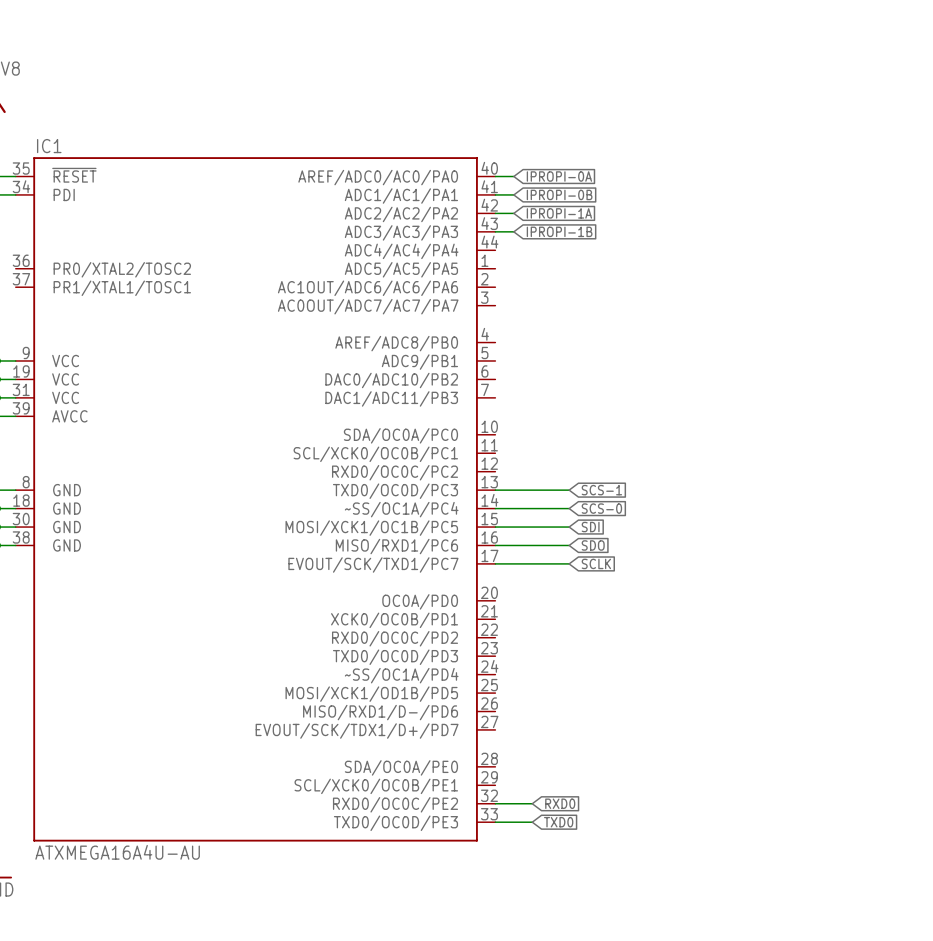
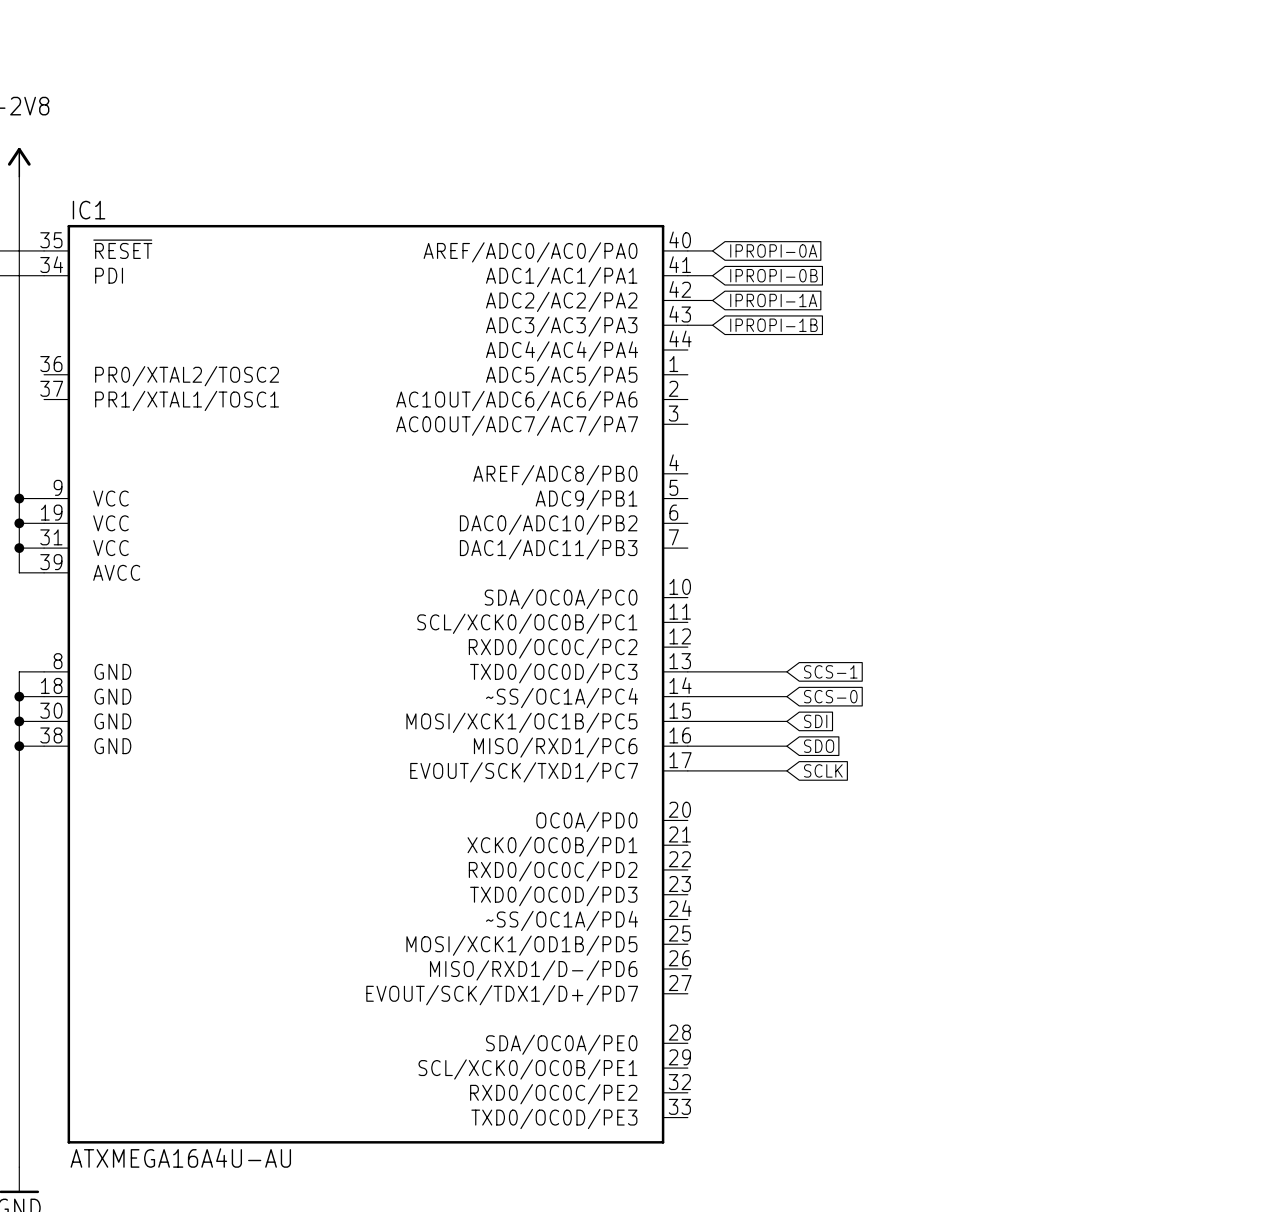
wire: (495, 803) (532, 803) -> none
global label: RXD0 (560, 803) -> none
wire: (495, 822) (532, 822) -> none
global label: TXD0 (558, 822) -> none

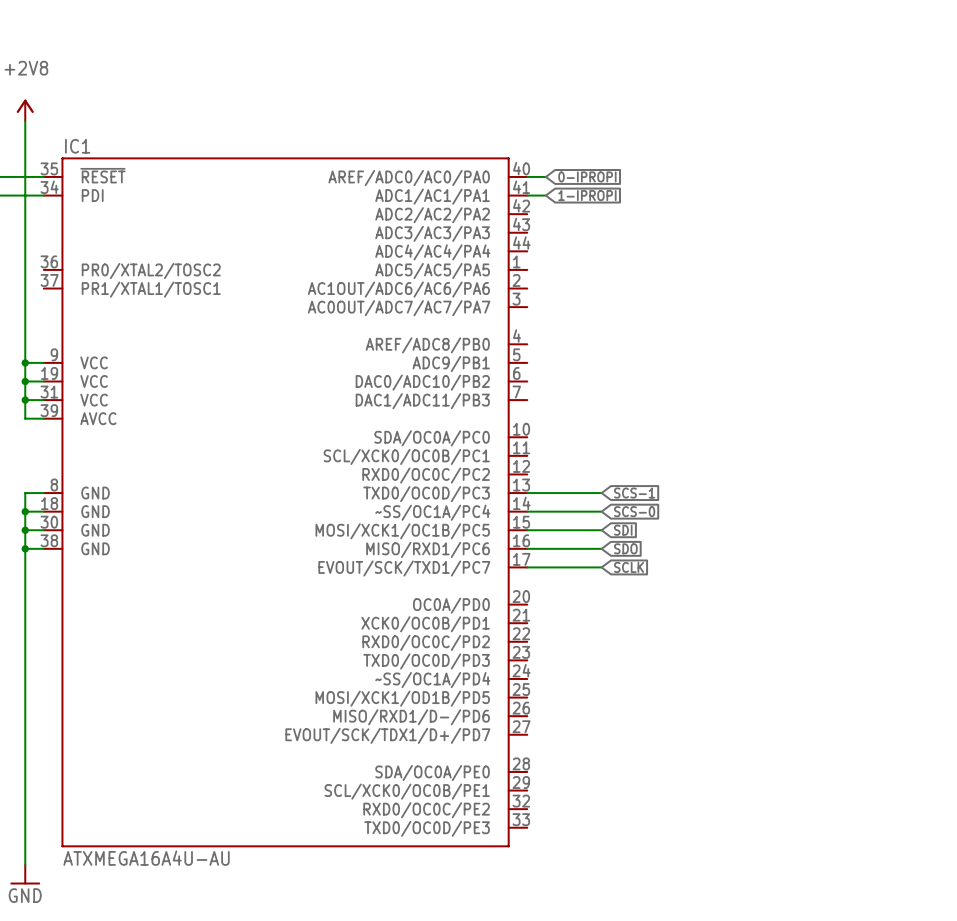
global label: IPROPI-0A (773, 250) -> 0-IPROPI (587, 176)
global label: IPROPI-0B (774, 275) -> 1-IPROPI (587, 195)
wire: (687, 300) (712, 300) -> none
global label: IPROPI-1A (773, 300) -> none
wire: (687, 325) (712, 325) -> none
global label: IPROPI-1B (774, 325) -> none

